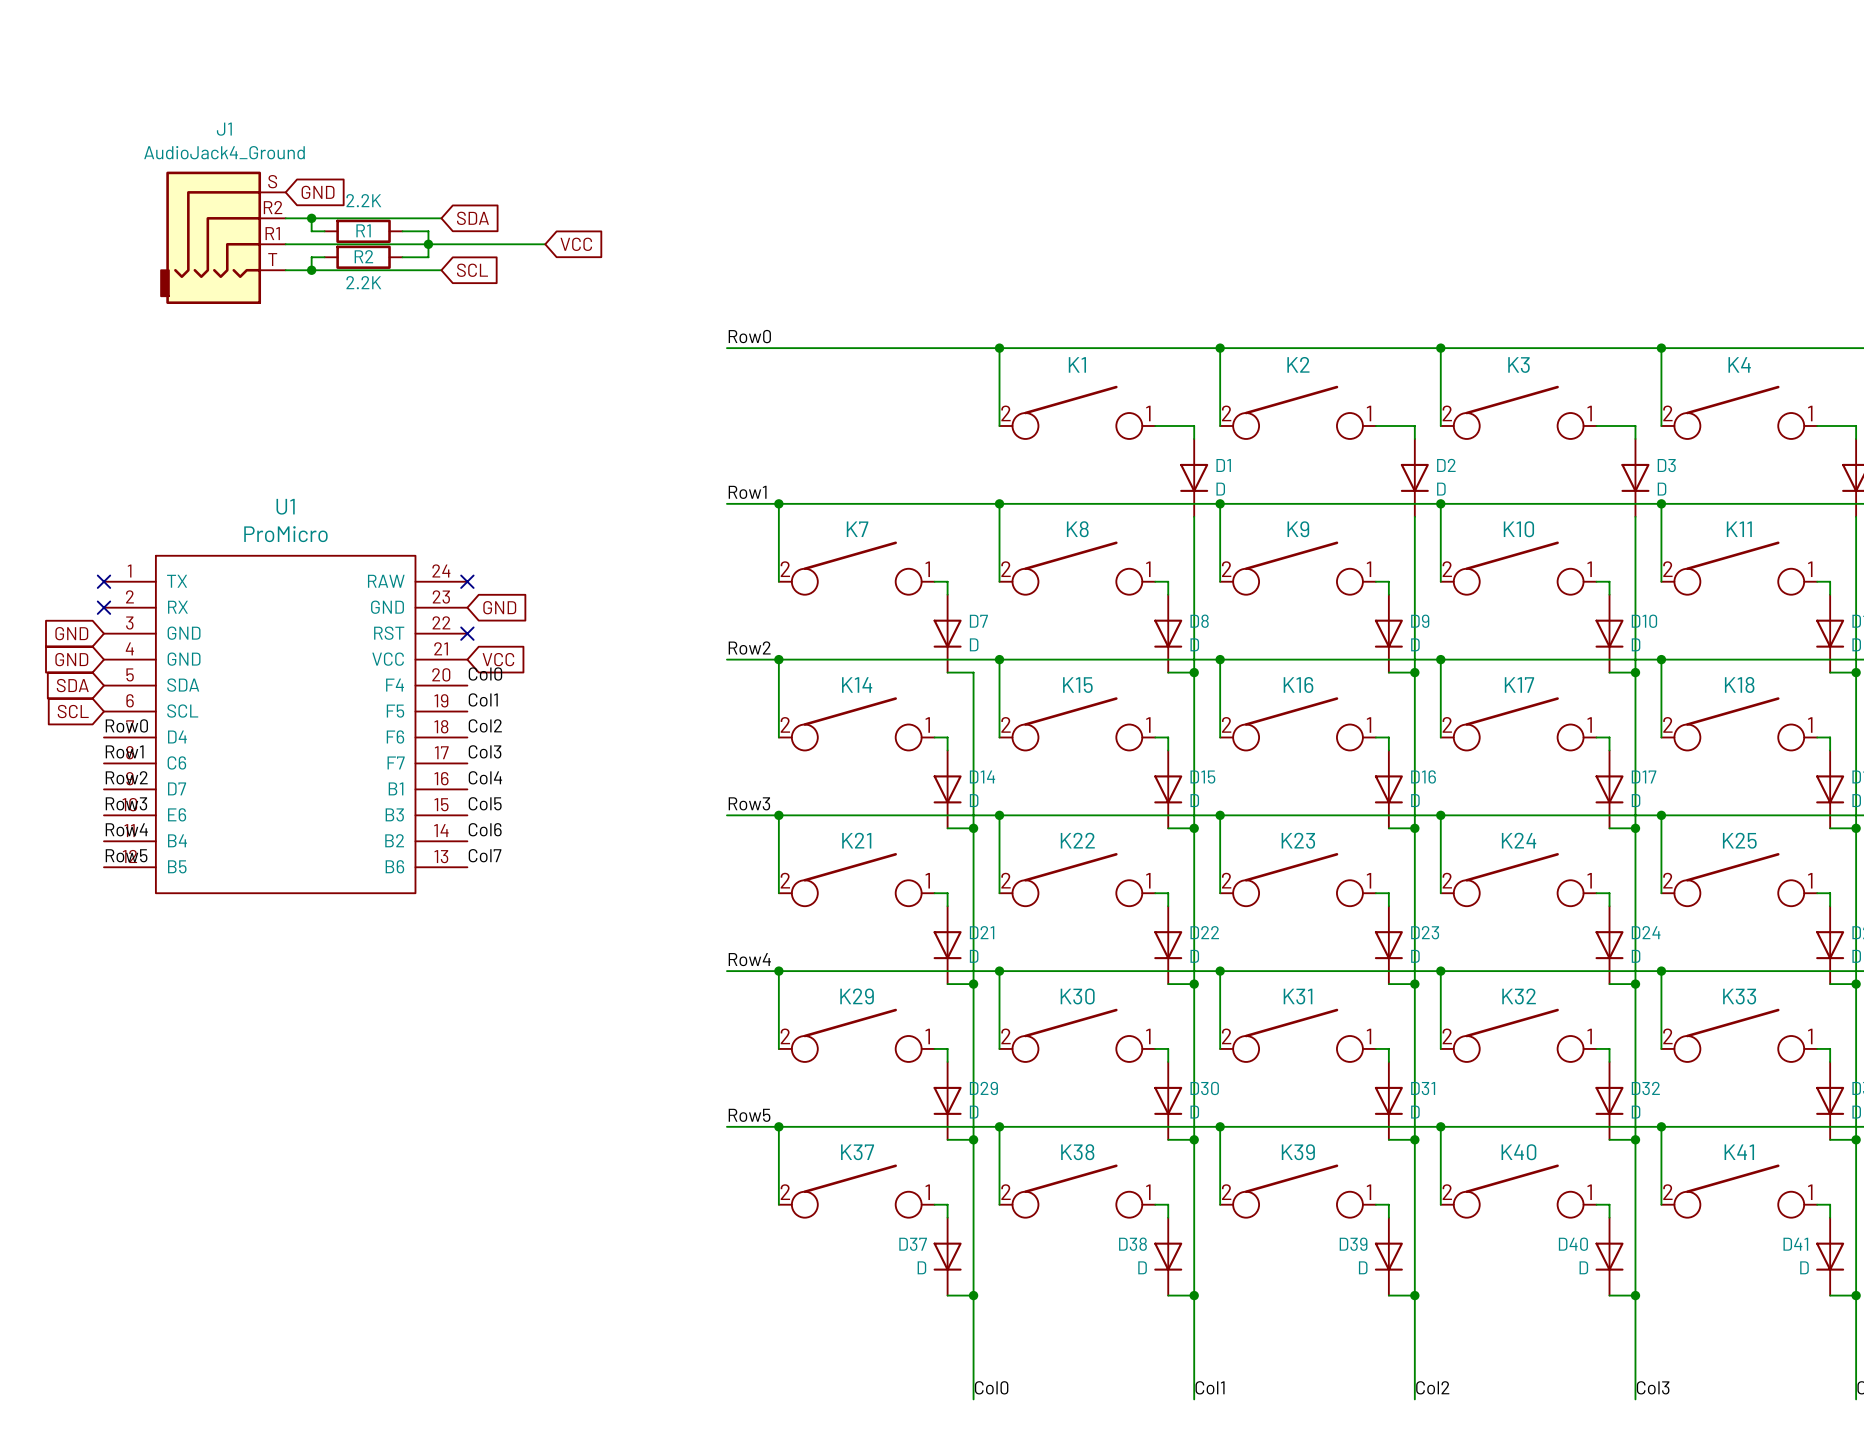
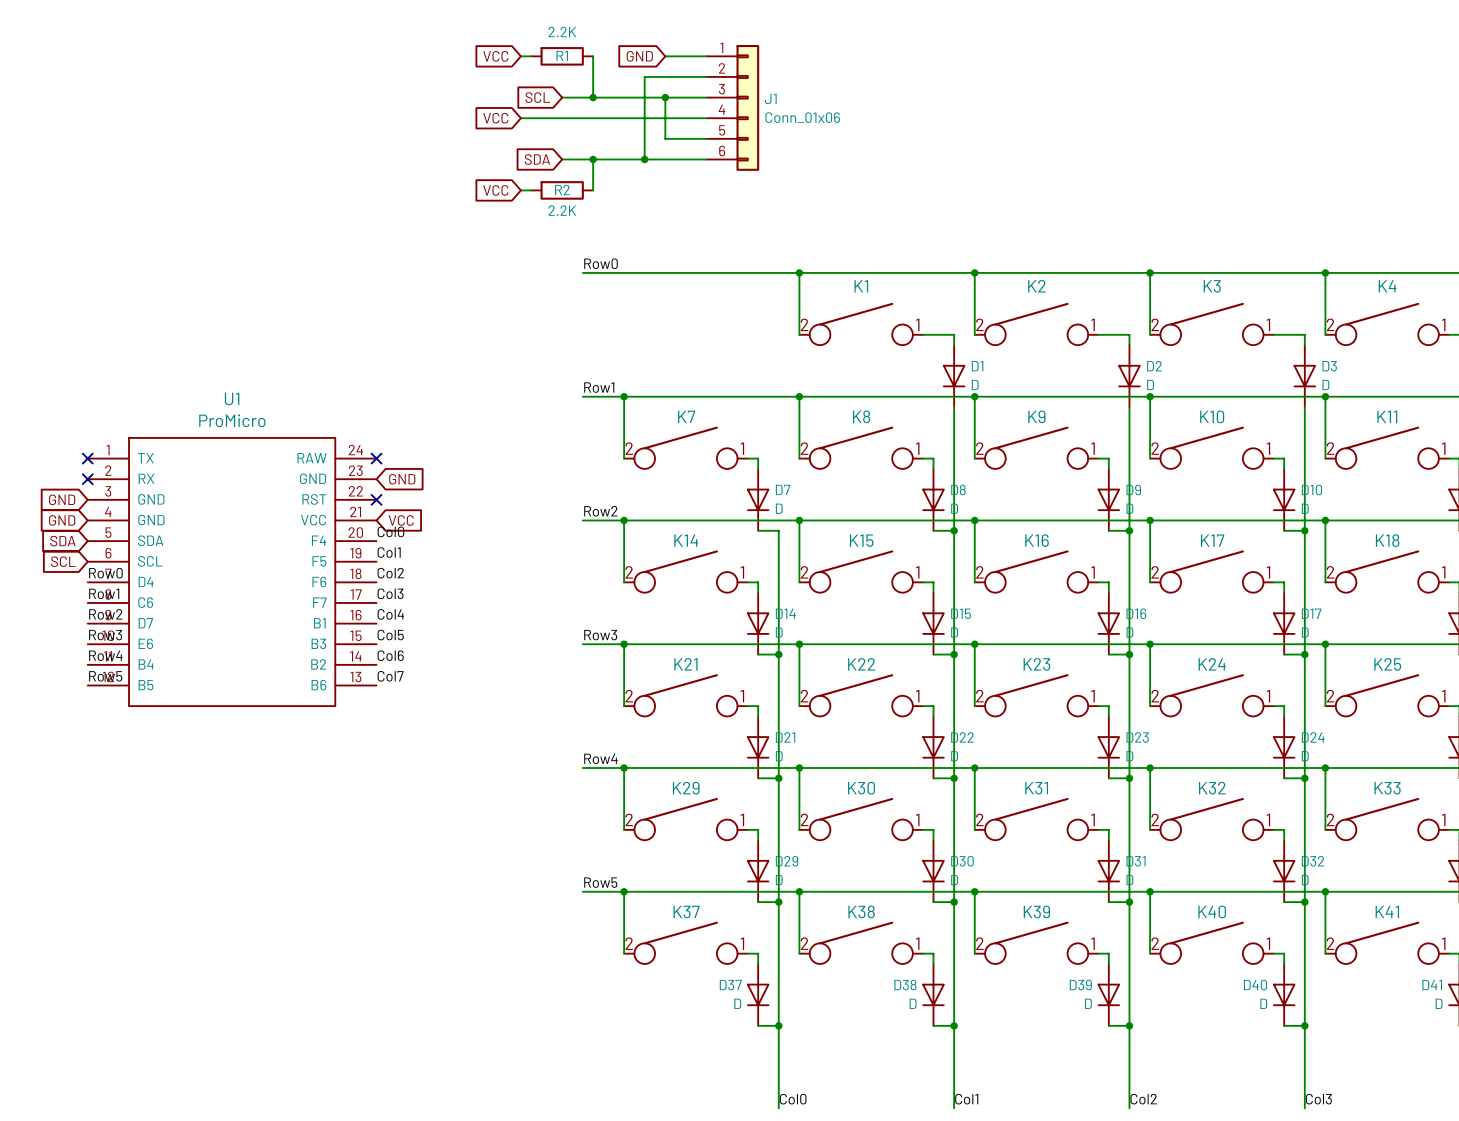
global label: none -> VCC (495, 56)
wire: none -> (520, 56) (531, 56)
wire: none -> (593, 56) (593, 97)
global label: none -> GND (639, 56)
wire: none -> (665, 56) (706, 56)
wire: none -> (706, 76) (644, 76) (644, 159)
global label: none -> SCL (537, 97)
wire: none -> (562, 97) (706, 97)
junction: none -> (593, 97)
wire: none -> (665, 97) (665, 138) (706, 138)
junction: none -> (665, 97)
J1 name position: J1 (224, 129) -> J1 (770, 98)
J1 value: AudioJack4_Ground (224, 152) -> Conn_01x06 (802, 117)
global label: none -> VCC (495, 118)
wire: none -> (520, 118) (706, 118)
J1 symbol: [161, 171, 286, 304] -> [706, 45, 760, 171]
global label: GND (318, 192) -> none
global label: none -> SDA (537, 159)
wire: none -> (562, 159) (706, 159)
wire: none -> (593, 159) (593, 190)
junction: none -> (593, 159)
junction: none -> (644, 159)
wire: (285, 218) (441, 218) -> none
wire: (311, 218) (311, 231) (324, 231) -> none
junction: (311, 218) -> none
global label: SDA (472, 218) -> none
R1 position: (363, 231) -> (562, 56)
wire: (402, 231) (428, 231) (428, 257) (402, 257) -> none
wire: (285, 244) (545, 244) -> none
junction: (428, 244) -> none
global label rotation: 0° (576, 244) -> 180° (495, 190)
wire: none -> (520, 190) (531, 190)
wire: (324, 257) (311, 257) (311, 270) -> none
R2 position: (363, 257) -> (562, 190)
wire: (285, 270) (441, 270) -> none
junction: (311, 270) -> none
global label: SCL (472, 270) -> none

